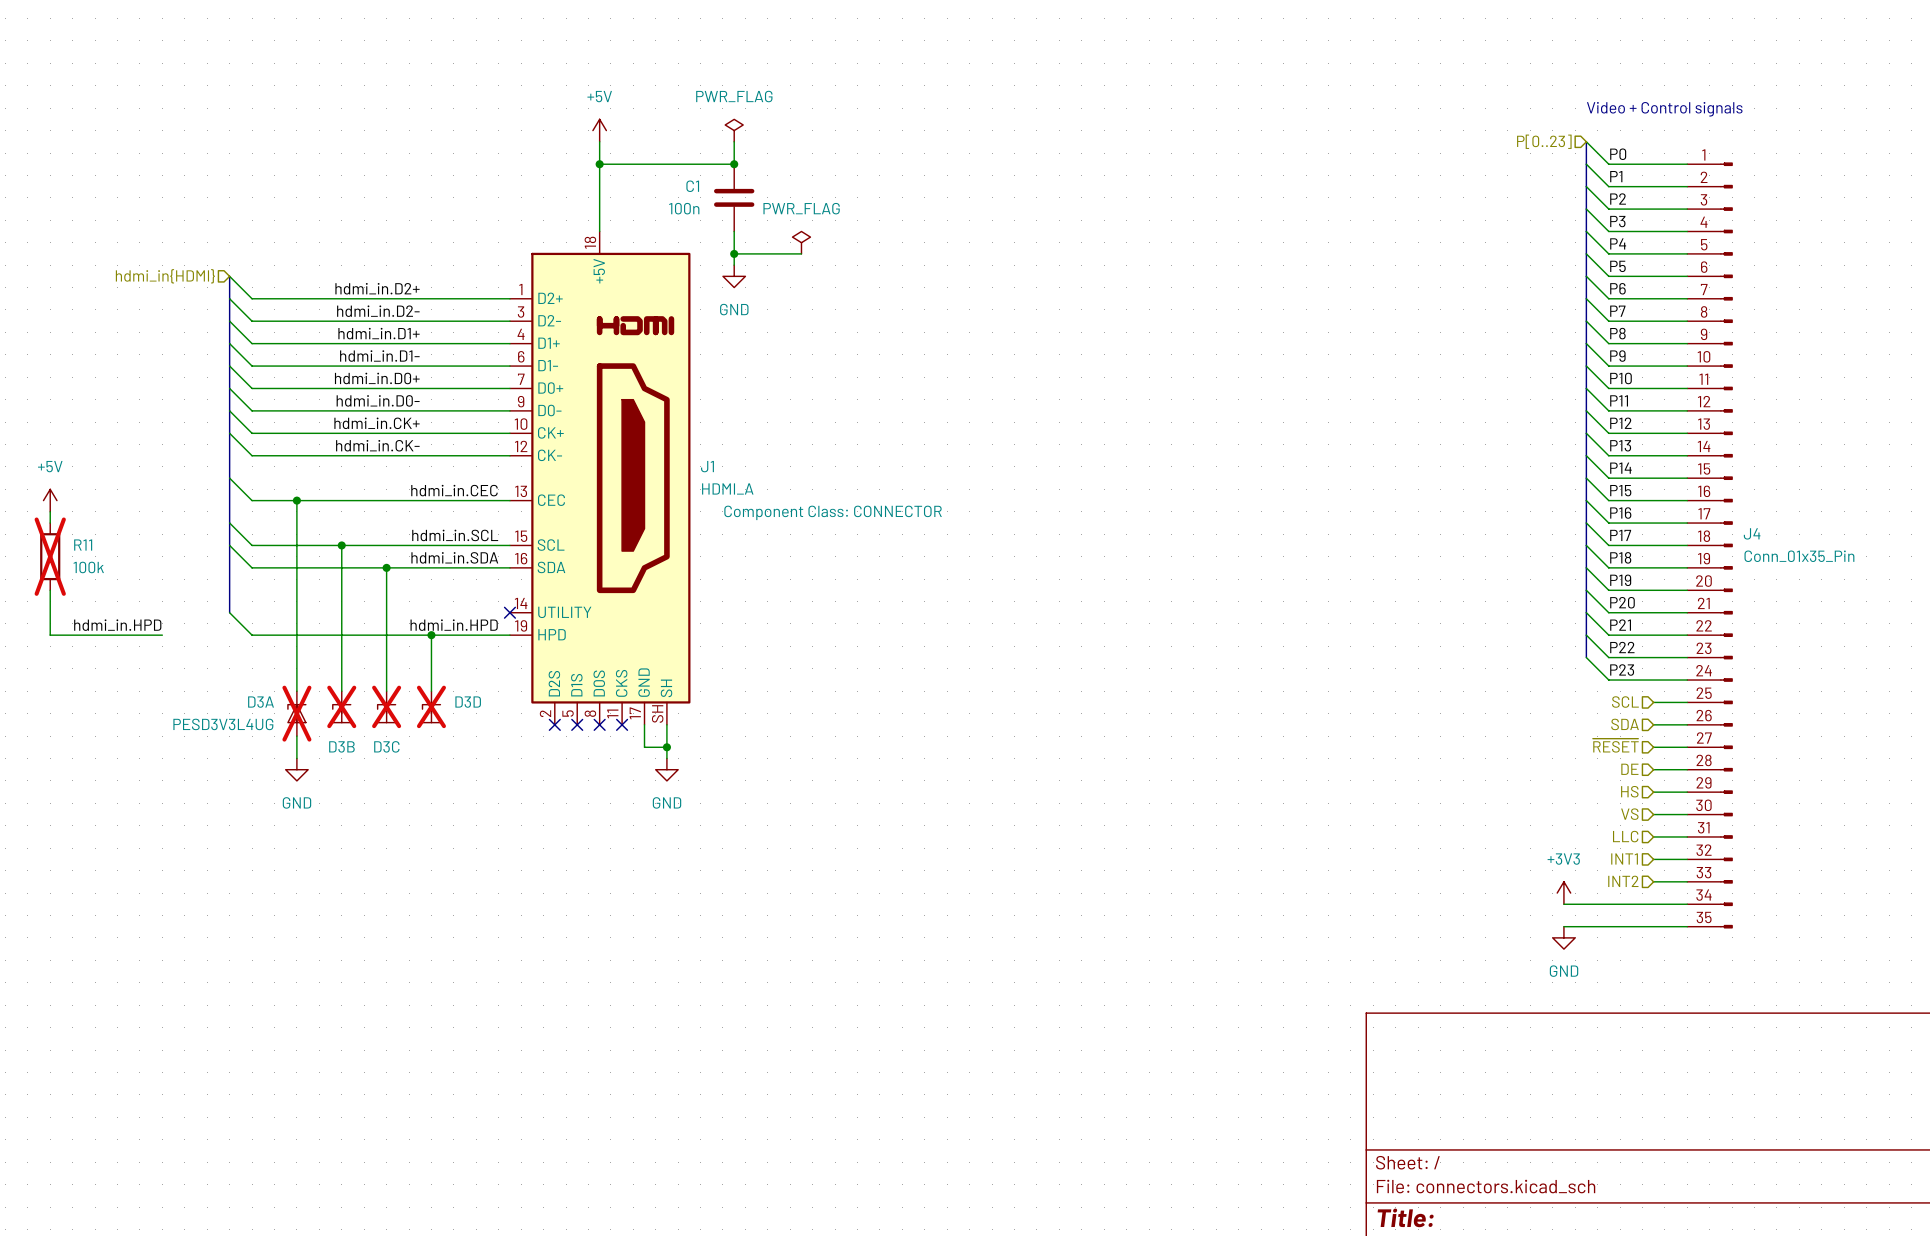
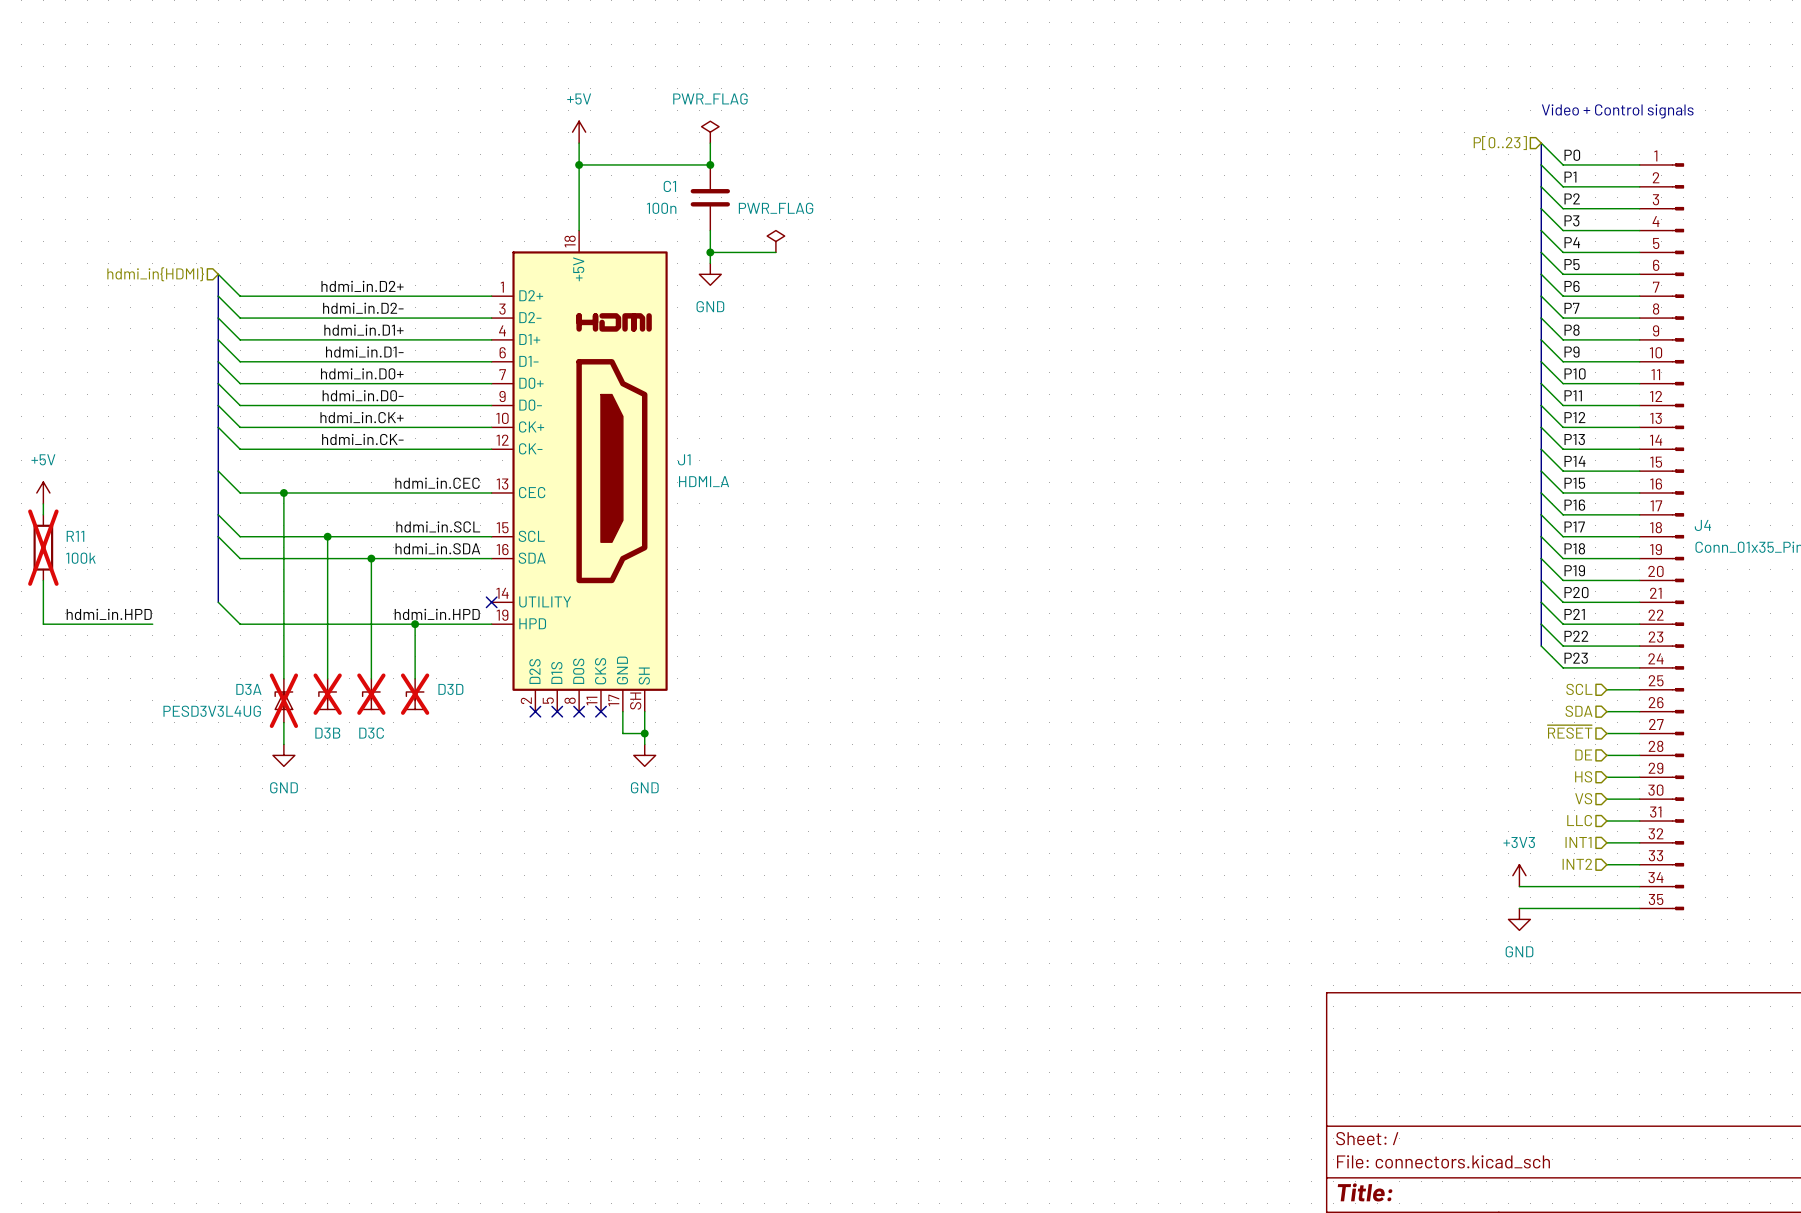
J1 text: Component Class: CONNECTOR (833, 512) -> none

